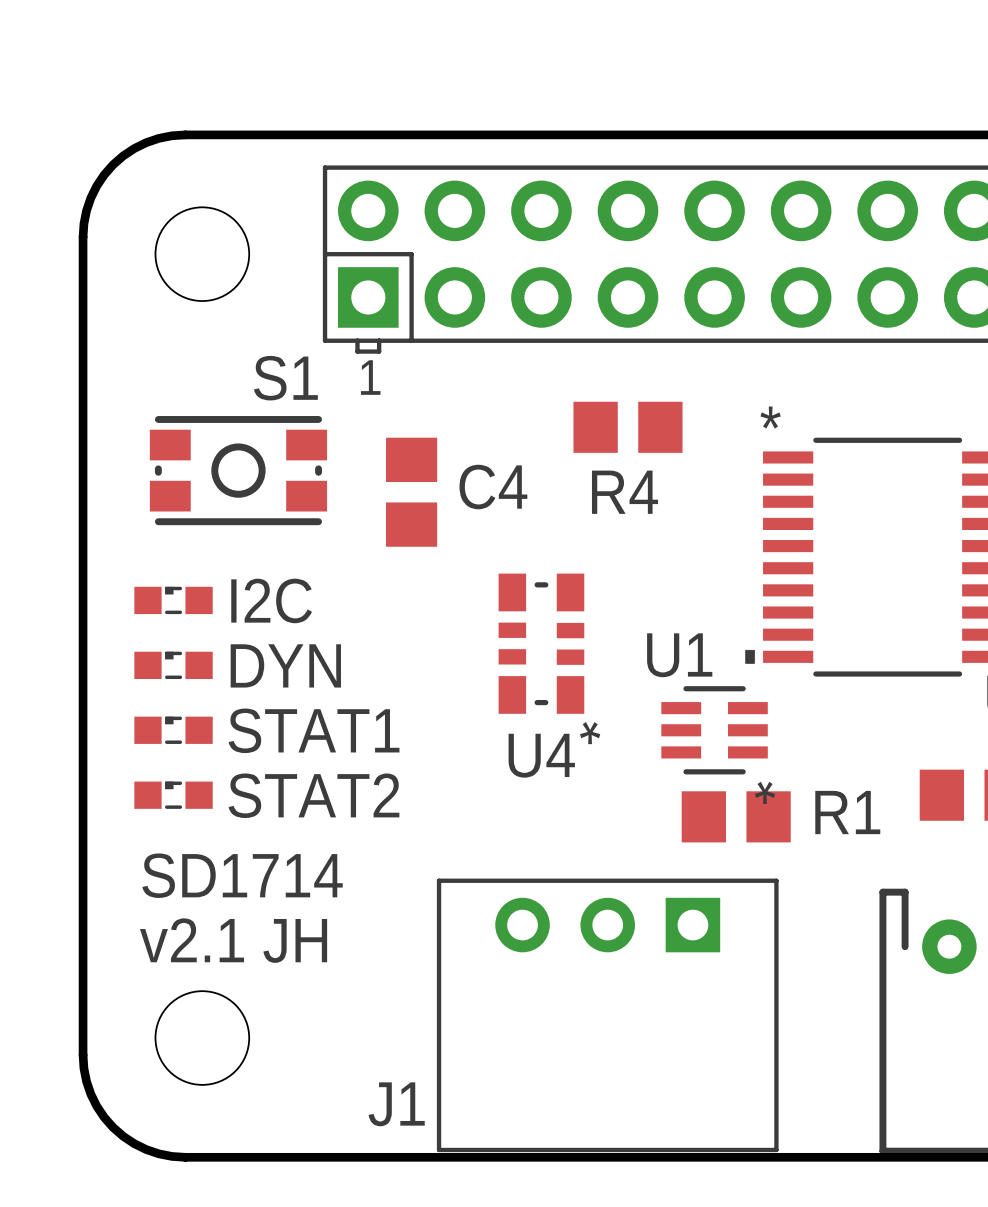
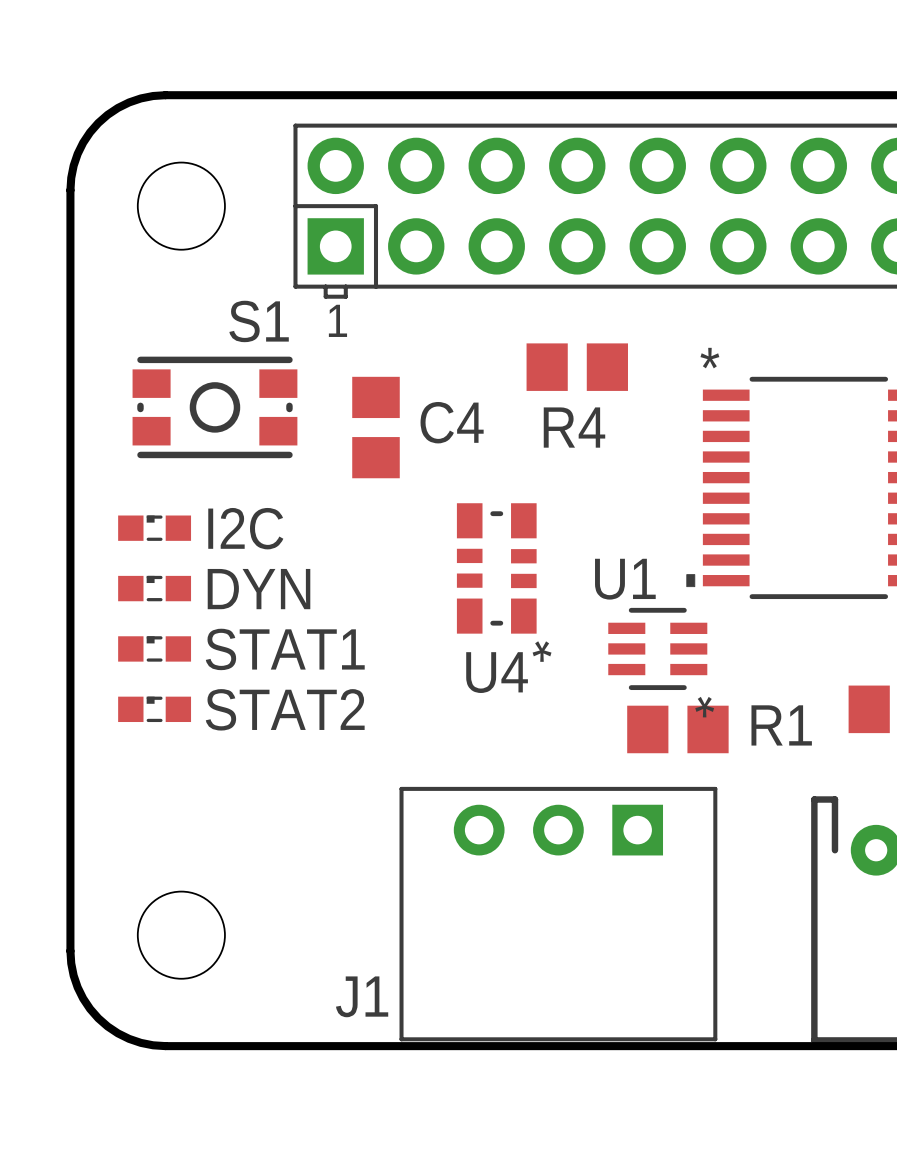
text: SD1714 (242, 875) -> none
text: v2.1 JH (233, 940) -> none

